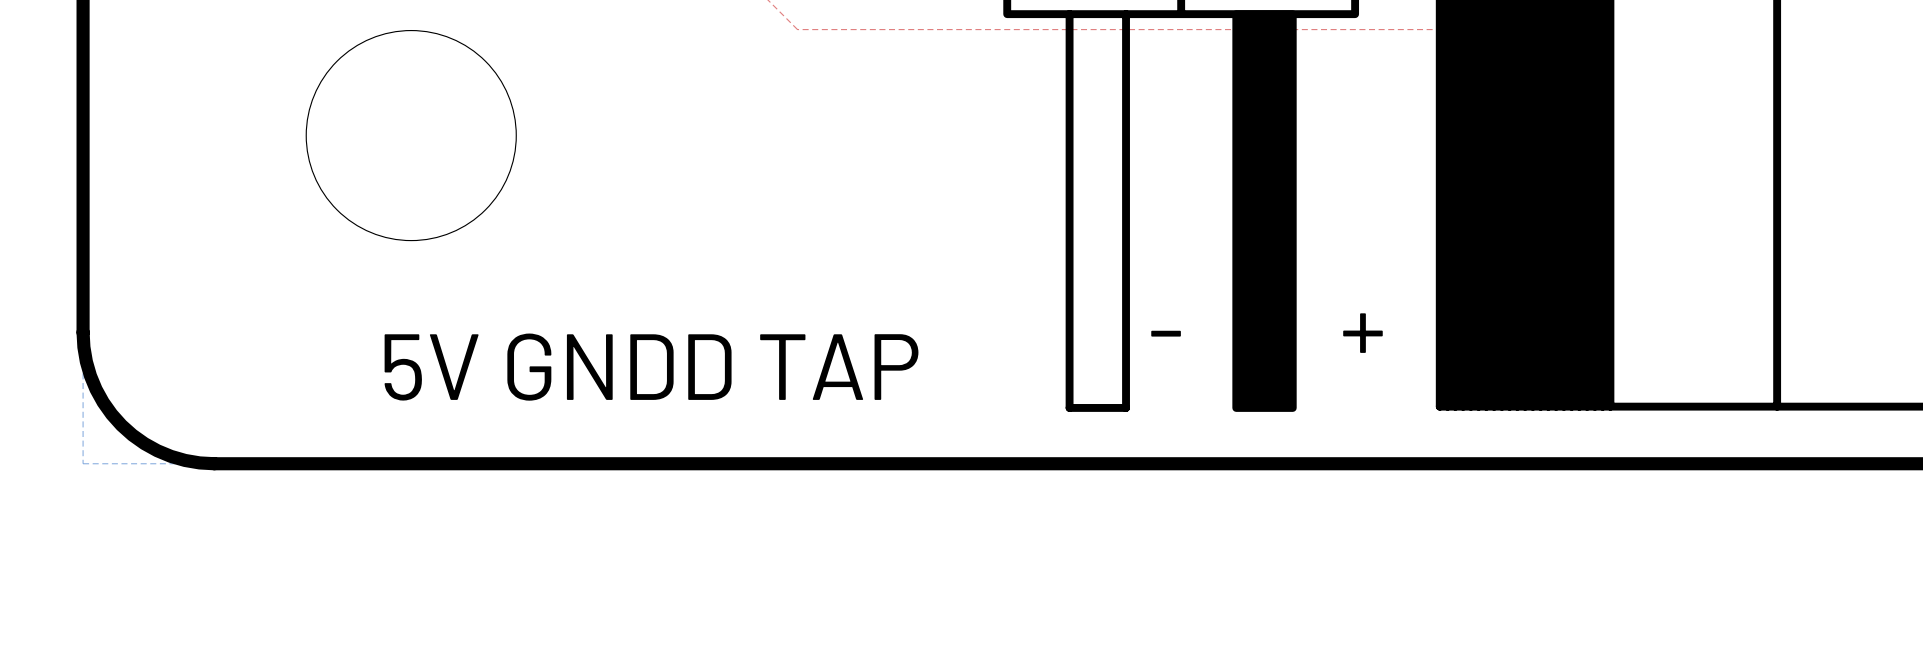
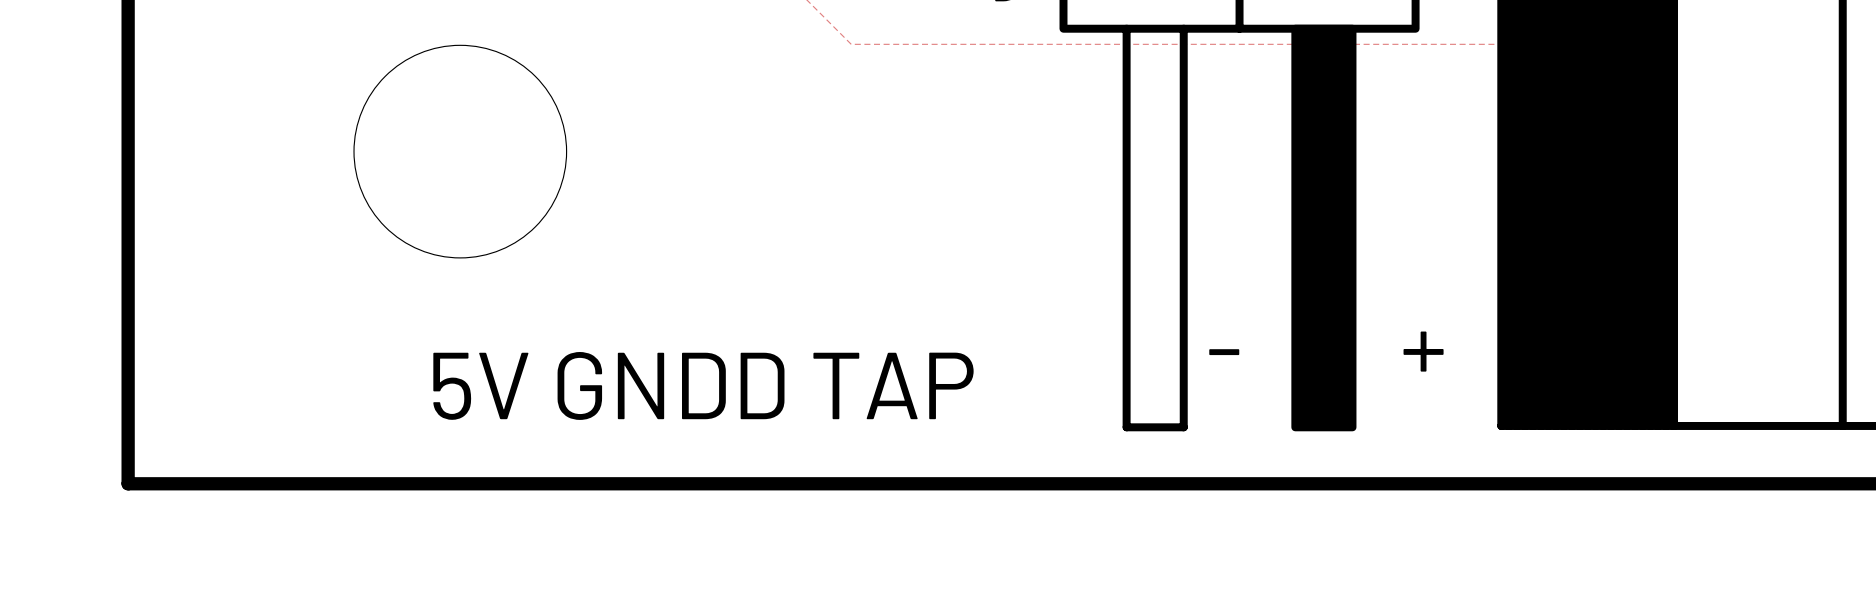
board edge: (83, 332) (86, 361) (96, 389) (111, 414) (121, 425) (144, 443) (170, 456) (185, 460) (214, 463) -> (128, 350) (128, 483) (261, 483)

